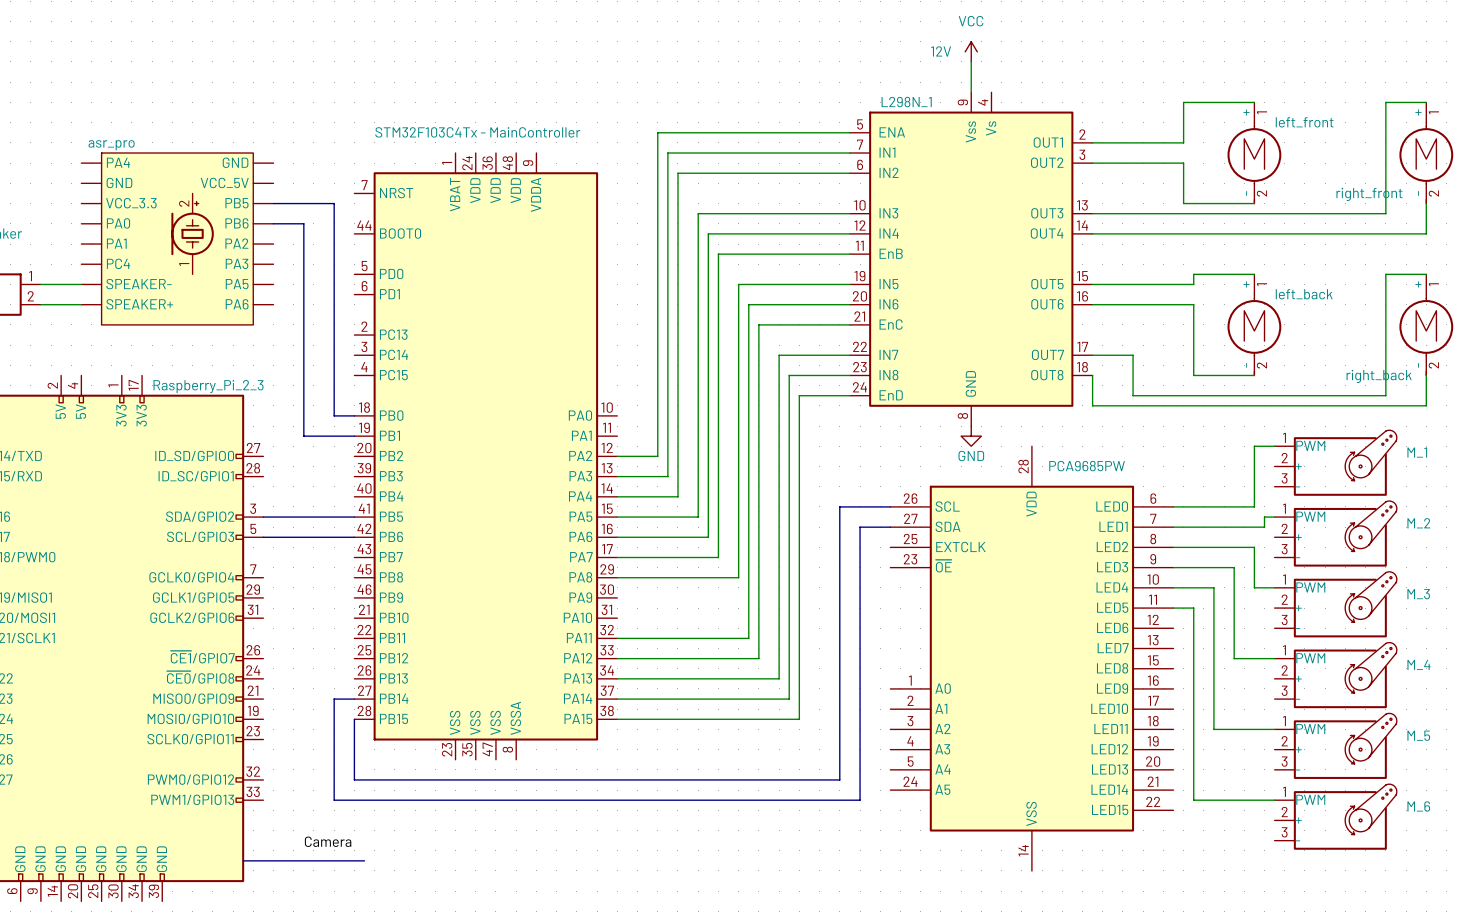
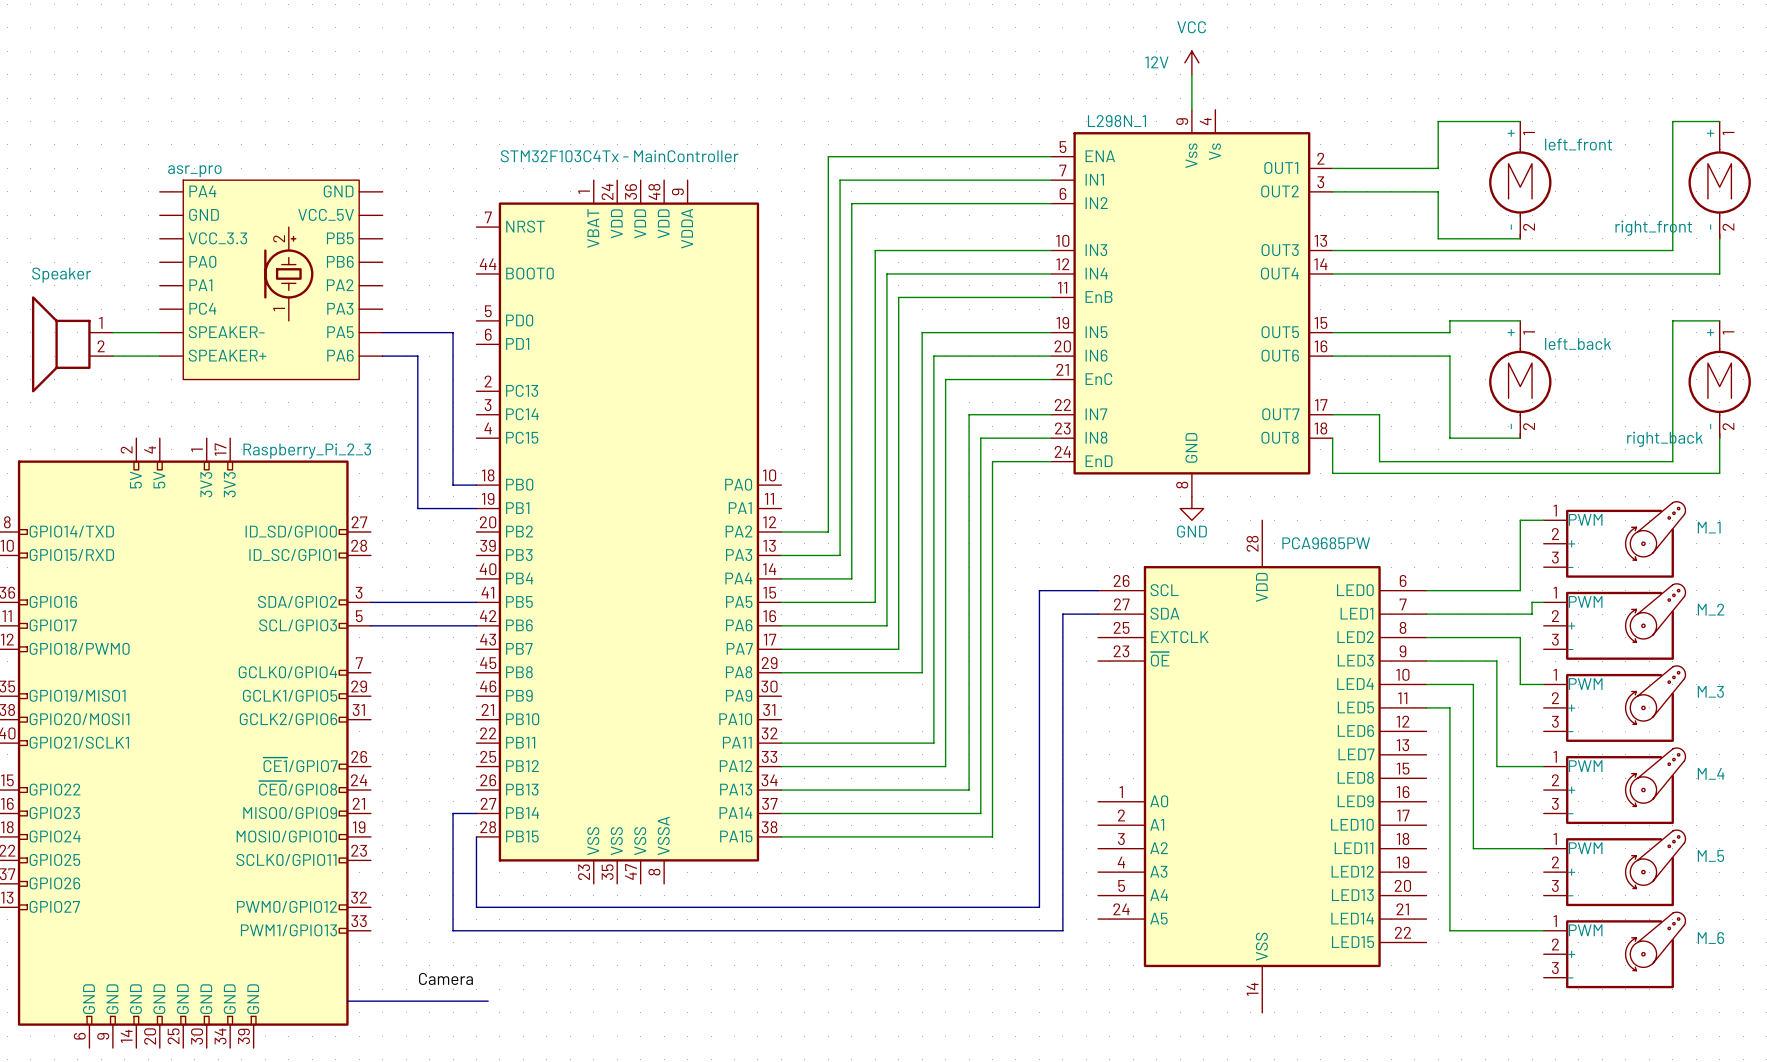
bus: (273, 203) (334, 203) (334, 284) -> (382, 332) (453, 332)
bus: (273, 223) (303, 223) (303, 304) -> (382, 356) (417, 356)

